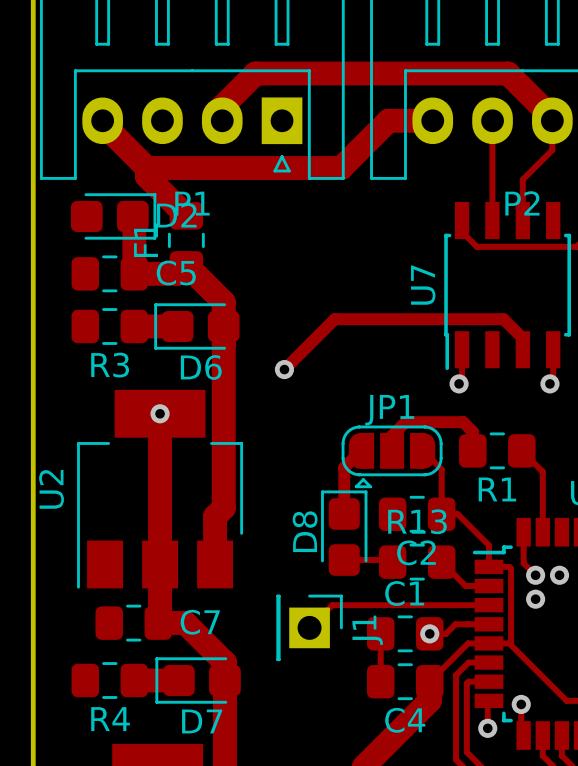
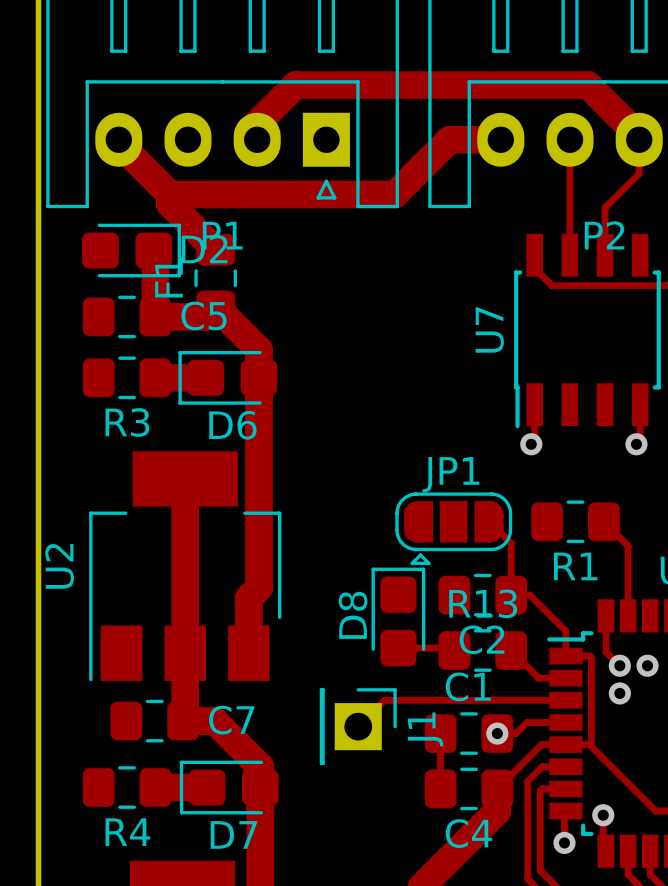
track: (522, 349) (522, 338) (503, 319) (334, 319) (284, 369) -> none
via: (284, 369) -> none
via: (160, 413) -> none
track: (360, 450) (344, 467) (344, 513) -> none
track: (392, 450) (392, 435) (405, 422) (463, 422) (472, 431) (472, 450) -> none

